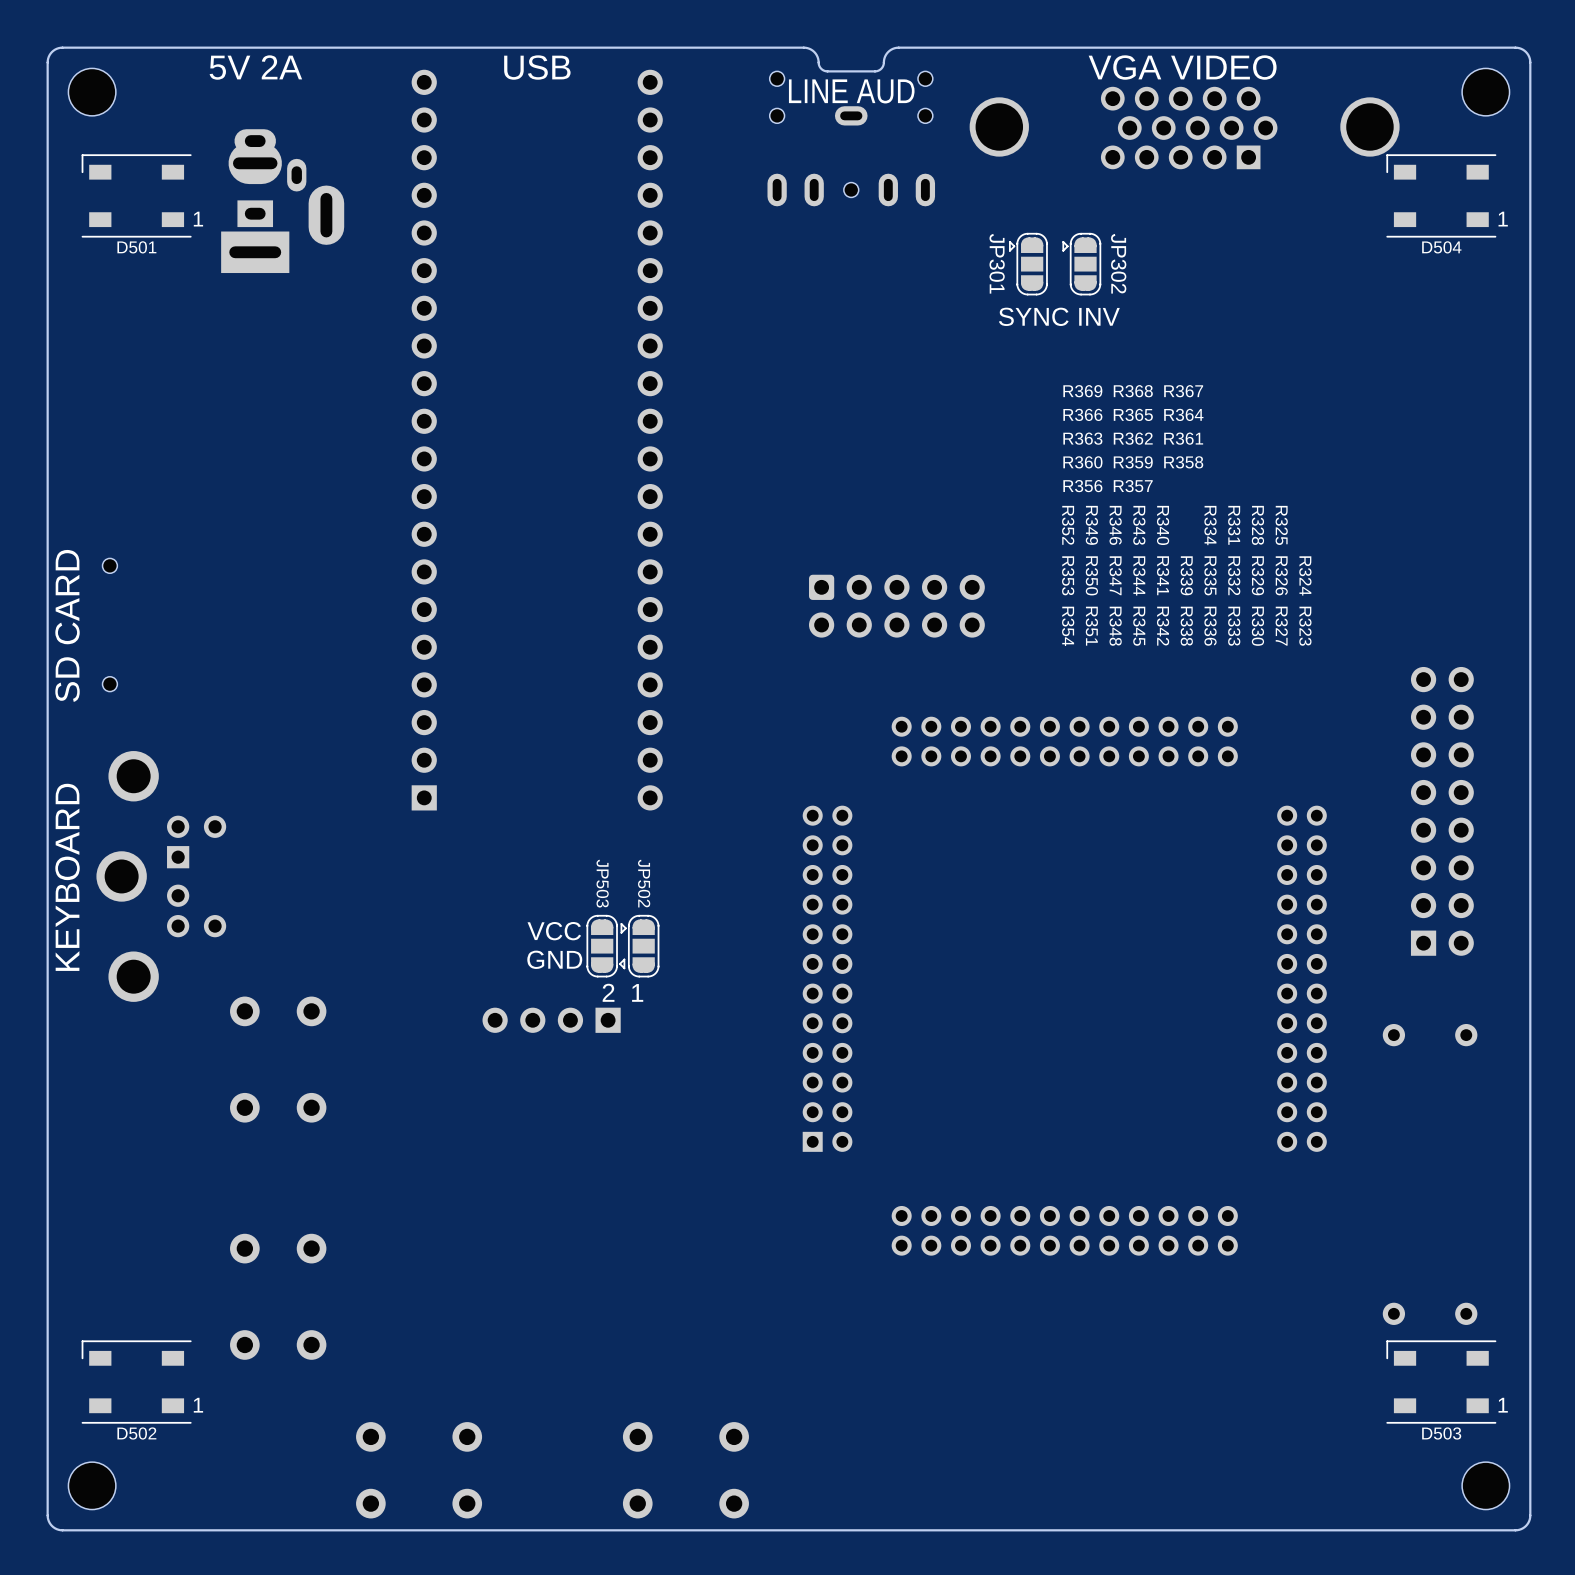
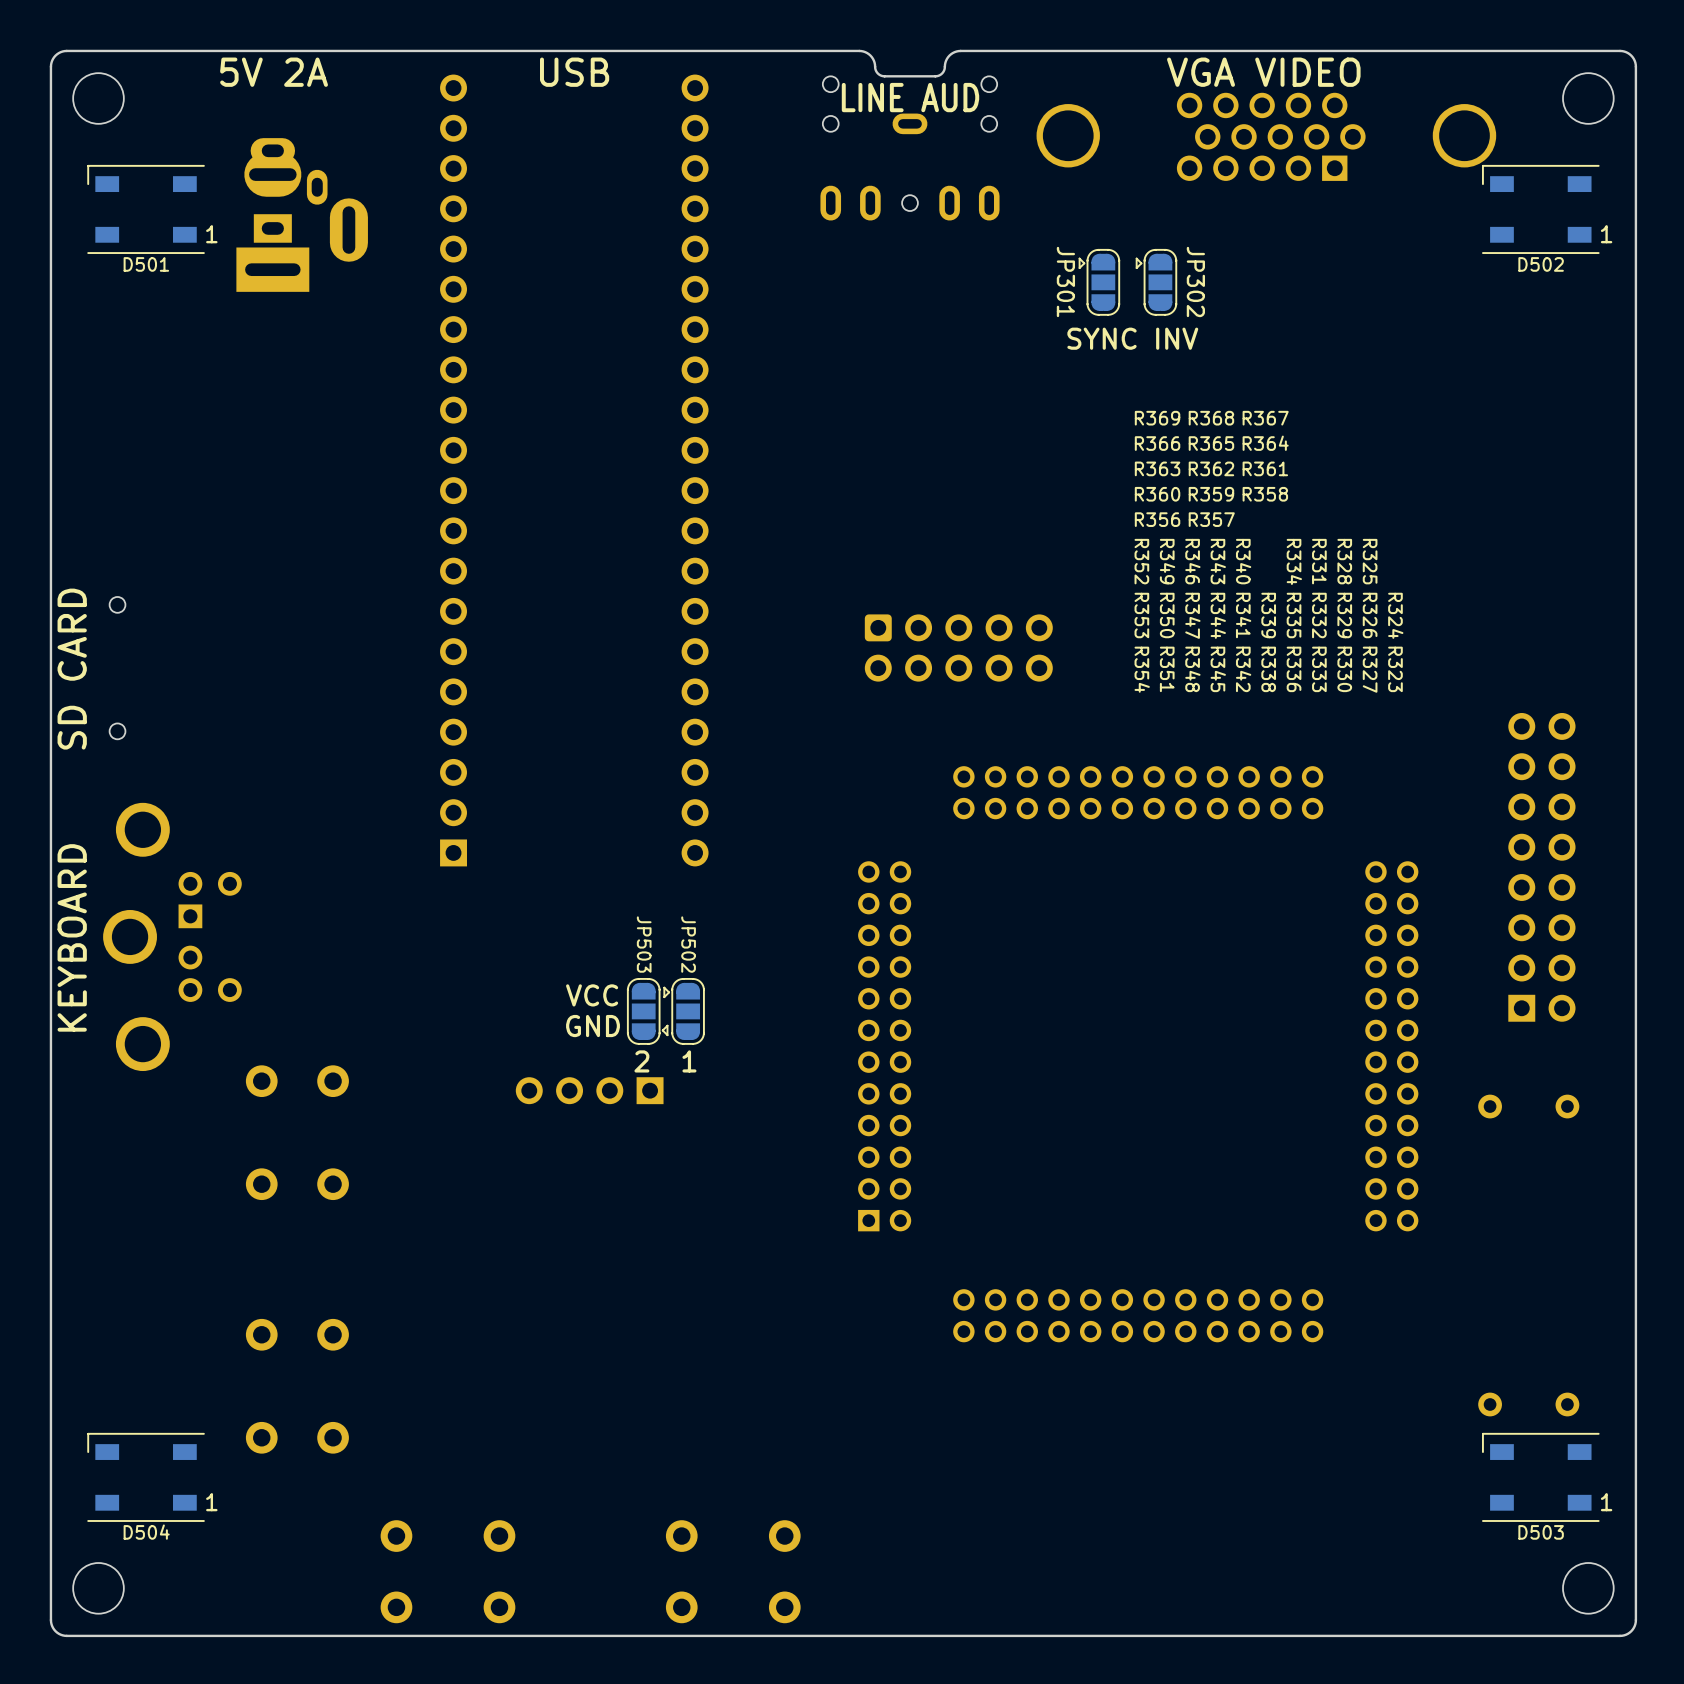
D504 name: D504 (1441, 247) -> D502 (1541, 264)
D502 name: D502 (136, 1433) -> D504 (146, 1532)

